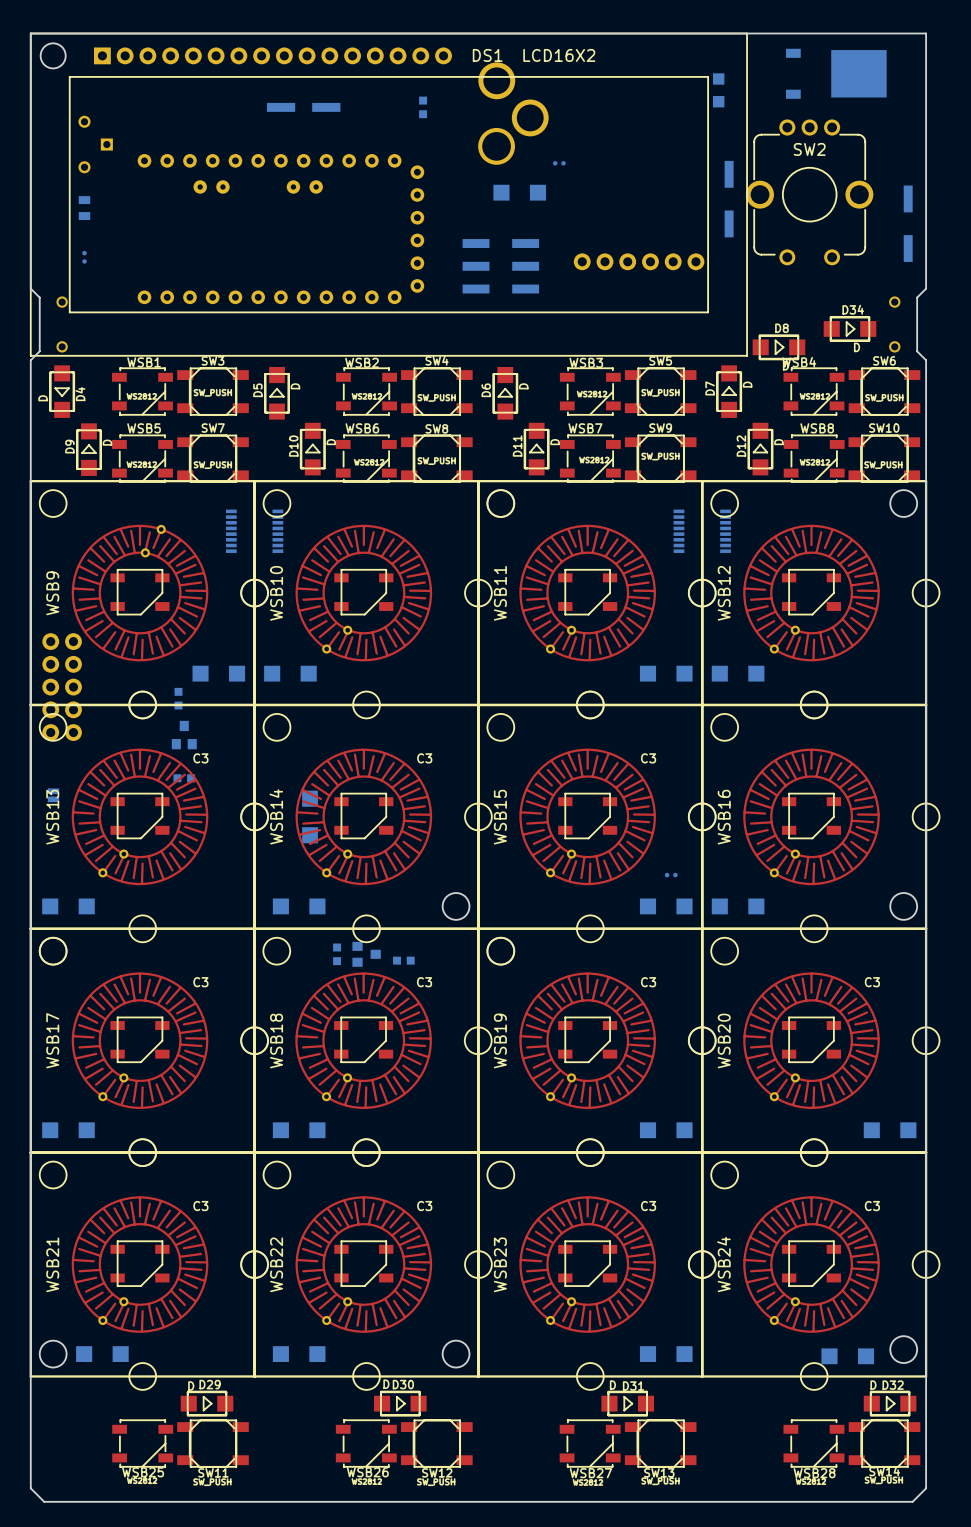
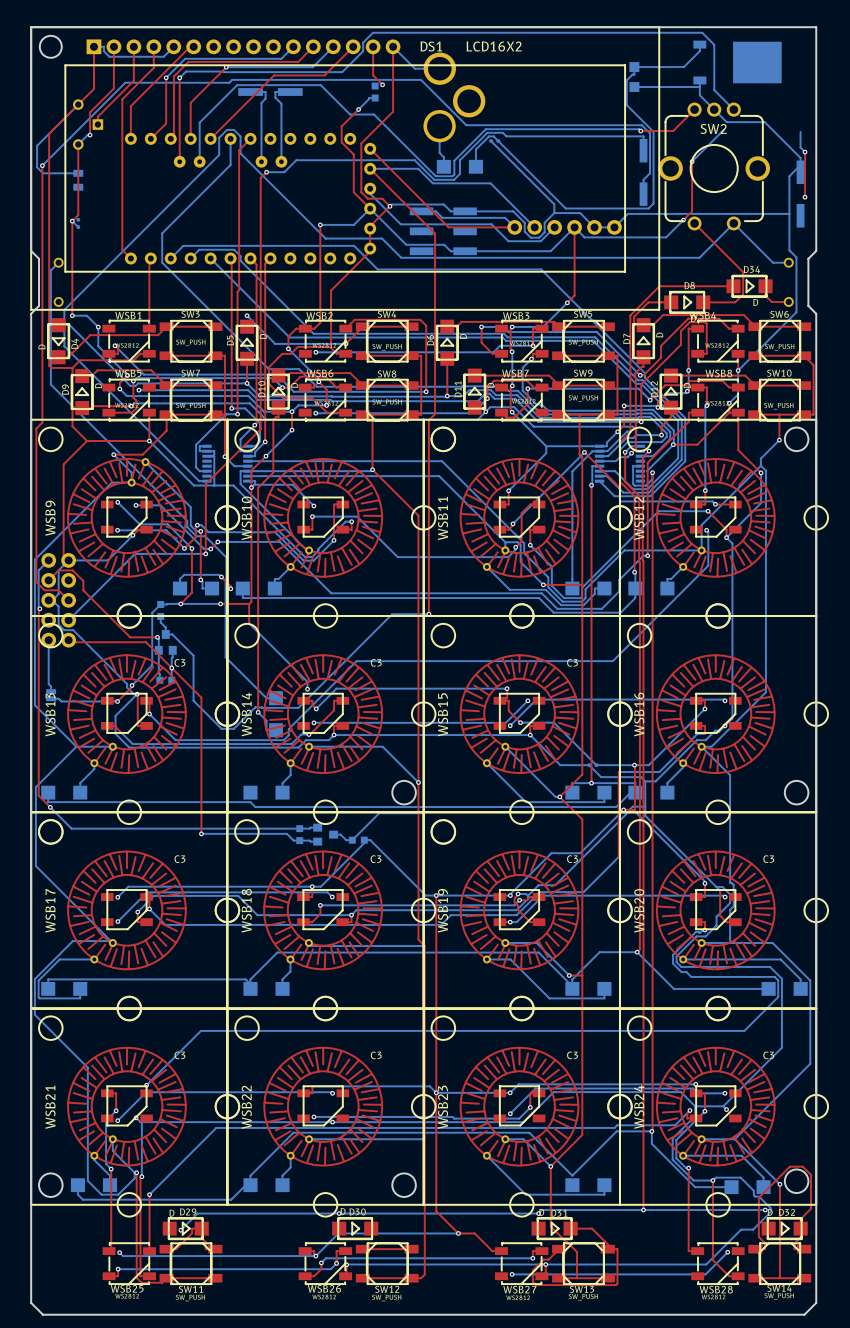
bottom track: none -> (699, 44) (699, 51) (683, 67) (634, 67) (634, 74) (626, 80) (626, 105) (653, 131) (653, 203) (648, 208) (565, 208) (493, 136) (489, 136) (475, 149) (475, 166)
bottom track: none -> (93, 46) (103, 46) (103, 51) (109, 56) (163, 56) (173, 46)
top track: none -> (93, 46) (93, 88) (49, 133) (49, 365) (51, 367) (72, 367)
top track: none -> (113, 46) (113, 88) (90, 112) (90, 135)
top track: none -> (133, 46) (133, 80) (97, 116) (97, 124)
top track: none -> (153, 46) (153, 67) (122, 99) (122, 249) (130, 258)
top track: none -> (193, 46) (190, 46) (130, 106) (130, 138)
bottom track: none -> (293, 46) (281, 58) (185, 58) (166, 77)
top track: none -> (313, 46) (298, 61) (188, 61) (173, 76) (173, 135) (170, 138)
bottom track: none -> (333, 46) (312, 67) (226, 67)
top track: none -> (353, 46) (324, 75) (274, 75) (210, 138)
top track: none -> (373, 46) (373, 75) (382, 84)
bottom track: none -> (393, 46) (414, 68) (439, 68)
top track: none -> (393, 46) (393, 111) (361, 143) (361, 192) (367, 198) (382, 198) (389, 206) (370, 226) (370, 251) (331, 290) (331, 348) (336, 353) (345, 353)
top track: none -> (226, 67) (190, 102) (190, 138)
via: none -> (226, 67)
top track: none -> (166, 77) (166, 123) (150, 138)
via: none -> (166, 77)
bottom track: none -> (179, 77) (186, 71) (342, 72) (363, 51) (363, 42) (373, 32) (702, 32) (714, 44) (714, 90) (733, 109)
top track: none -> (179, 77) (179, 161)
via: none -> (179, 77)
bottom track: none -> (699, 80) (699, 95) (726, 122) (764, 122) (800, 157) (800, 172)
via: none -> (382, 84)
bottom track: none -> (634, 87) (699, 87)
bottom track: none -> (250, 92) (265, 92) (265, 98) (261, 102) (261, 161)
bottom track: none -> (290, 92) (275, 92) (275, 97) (281, 103) (281, 161)
bottom track: none -> (375, 97) (369, 97) (358, 109)
bottom track: none -> (78, 104) (37, 145) (37, 167) (43, 173) (78, 173)
top track: none -> (358, 109) (341, 126) (341, 142) (353, 154) (353, 192) (370, 208)
via: none -> (358, 109)
top track: none -> (694, 109) (673, 131) (640, 131)
bottom track: none -> (439, 126) (439, 153) (443, 157) (443, 166)
bottom track: none -> (724, 129) (692, 161)
bottom track: none -> (640, 131) (638, 129) (485, 129) (454, 160) (454, 174) (452, 176) (435, 176) (374, 114) (350, 114) (320, 85) (237, 85) (199, 122) (199, 161)
via: none -> (640, 131)
bottom track: none -> (800, 131) (800, 147) (805, 152)
bottom track: none -> (90, 135) (78, 144)
via: none -> (90, 135)
bottom track: none -> (230, 138) (230, 164) (162, 233) (162, 262) (268, 369) (299, 369) (316, 386) (503, 386) (508, 390) (517, 390) (541, 414) (651, 413) (670, 431) (670, 438) (653, 456) (640, 456)
top track: none -> (250, 138) (239, 150) (237, 414)
bottom track: none -> (491, 141) (554, 204) (554, 213)
top track: none -> (78, 144) (78, 215) (72, 221) (72, 315)
top track: none -> (370, 148) (448, 227) (514, 227)
bottom track: none -> (643, 150) (643, 136) (506, 136) (502, 132) (487, 132) (459, 160) (459, 173) (454, 179) (434, 179) (414, 160) (296, 160) (284, 172) (266, 172)
top track: none -> (805, 152) (805, 197)
via: none -> (805, 152)
top track: none -> (692, 161) (692, 211) (683, 220)
via: none -> (692, 161)
bottom track: none -> (800, 165) (789, 176) (789, 250) (796, 257) (796, 312) (738, 370) (738, 394) (729, 403)
bottom track: none -> (42, 165) (125, 82) (229, 82) (232, 79) (421, 79) (466, 125) (641, 125) (650, 133) (650, 173) (643, 179) (643, 194)
top track: none -> (42, 165) (42, 422) (36, 428) (36, 582) (44, 590) (58, 590) (68, 600)
via: none -> (42, 165)
bottom track: none -> (370, 168) (418, 168) (432, 183) (490, 183) (534, 227)
top track: none -> (370, 168) (435, 233) (435, 414) (428, 420) (428, 614)
top track: none -> (266, 172) (260, 178) (260, 429) (205, 484) (205, 553)
via: none -> (266, 172)
bottom track: none -> (370, 188) (370, 193) (400, 224) (491, 224) (508, 241) (540, 241) (554, 227)
via: none -> (805, 197)
bottom track: none -> (389, 206) (391, 204) (443, 204) (450, 211) (513, 211) (524, 222) (524, 231) (530, 237) (539, 237) (544, 232) (544, 222) (554, 213)
via: none -> (389, 206)
bottom track: none -> (421, 211) (435, 211) (442, 217) (505, 217) (514, 227)
bottom track: none -> (554, 213) (580, 213) (594, 227) (614, 227) (627, 213) (789, 213)
bottom track: none -> (683, 220) (666, 237) (584, 237) (574, 227) (550, 251) (450, 251) (444, 244) (406, 244) (370, 208) (353, 224) (320, 224)
via: none -> (683, 220)
bottom track: none -> (72, 221) (78, 227)
via: none -> (72, 221)
top track: none -> (694, 223) (743, 272) (743, 294) (735, 302) (703, 302)
top track: none -> (320, 224) (320, 322) (314, 328) (296, 328) (288, 336) (288, 348)
via: none -> (320, 224)
top track: none -> (574, 227) (574, 295) (567, 302)
top track: none -> (150, 258) (149, 328)
bottom track: none -> (170, 258) (183, 245) (354, 245) (377, 269) (541, 269) (645, 373) (645, 377) (685, 417) (685, 461) (650, 496) (614, 496) (599, 481)
bottom track: none -> (190, 258) (199, 249) (234, 249) (240, 256) (240, 260) (313, 333) (504, 333) (507, 337) (595, 337) (638, 380) (642, 380) (681, 419) (681, 459) (648, 492) (623, 492) (606, 476) (599, 476)
bottom track: none -> (210, 258) (289, 337) (502, 337) (506, 340) (593, 340) (636, 383) (641, 383) (678, 420) (678, 458) (647, 489) (633, 489) (615, 471) (599, 471)
top track: none -> (230, 258) (231, 408)
top track: none -> (250, 258) (256, 264) (256, 423) (254, 425)
top track: none -> (270, 258) (265, 263) (265, 441)
bottom track: none -> (58, 262) (50, 270) (50, 384) (187, 520) (187, 527) (196, 536) (205, 536) (226, 557) (225, 657) (266, 698) (276, 698)
bottom track: none -> (788, 262) (773, 262) (733, 223) (699, 257) (401, 257) (382, 238) (325, 238) (240, 153) (240, 136) (234, 129) (226, 129) (219, 137) (219, 155) (64, 309) (64, 346) (199, 481) (207, 481)
top track: none -> (733, 286) (659, 286) (630, 315) (630, 431) (619, 442) (619, 481) (634, 496) (634, 572)
top track: none -> (765, 286) (765, 295) (771, 301) (788, 301)
bottom track: none -> (567, 302) (543, 326) (512, 326)
via: none -> (567, 302)
top track: none -> (671, 302) (648, 302) (634, 316) (634, 357) (643, 357) (643, 366) (635, 373) (635, 448) (631, 453)
bottom track: none -> (72, 315) (86, 315) (98, 327) (98, 346) (127, 375)
via: none -> (72, 315)
bottom track: none -> (247, 315) (275, 343) (346, 343)
via: none -> (247, 315)
bottom track: none -> (69, 325) (130, 385) (135, 385) (137, 383) (247, 383) (260, 396) (446, 396) (463, 396) (469, 390) (490, 390) (495, 395) (517, 395) (539, 417) (650, 416) (666, 433) (666, 436) (661, 442) (627, 442) (619, 450) (619, 457)
top track: none -> (643, 325) (653, 325) (663, 315) (743, 315) (755, 326) (804, 326)
via: none -> (98, 327)
top track: none -> (215, 326) (166, 326) (158, 335) (90, 335) (68, 357) (58, 357)
top track: none -> (411, 326) (362, 326) (346, 343)
top track: none -> (447, 326) (456, 326) (461, 321) (554, 321) (559, 326) (607, 326)
bottom track: none -> (481, 326) (503, 326) (509, 332) (596, 332) (640, 375)
top track: none -> (481, 326) (481, 342) (492, 353) (501, 353)
via: none -> (481, 326)
top track: none -> (512, 326) (510, 328) (512, 351)
via: none -> (512, 326)
top track: none -> (345, 328) (354, 319) (420, 319) (426, 325) (426, 391)
top track: none -> (542, 328) (533, 328) (533, 345)
top track: none -> (697, 328) (688, 328) (688, 370)
top track: none -> (738, 328) (729, 328) (719, 318) (688, 318) (660, 346) (660, 357) (643, 375) (640, 375)
via: none -> (346, 343)
bottom track: none -> (115, 345) (143, 374) (276, 374) (293, 391) (426, 391)
top track: none -> (115, 345) (117, 348) (117, 353) (108, 353)
via: none -> (115, 345)
bottom track: none -> (533, 345) (500, 345) (493, 352) (315, 352)
via: none -> (533, 345)
top track: none -> (331, 346) (297, 346) (290, 353) (282, 353) (268, 367) (268, 383) (283, 398) (312, 398) (326, 412) (345, 412)
bottom track: none -> (288, 348) (318, 379) (318, 381)
via: none -> (288, 348)
bottom track: none -> (512, 351) (512, 385)
via: none -> (512, 351)
via: none -> (315, 352)
top track: none -> (149, 353) (140, 353) (133, 360) (80, 360) (72, 367)
top track: none -> (542, 353) (533, 353) (531, 359)
top track: none -> (697, 353) (706, 353) (706, 323) (689, 322) (680, 331) (680, 344) (641, 384) (641, 421)
top track: none -> (738, 353) (738, 370)
top track: none -> (166, 355) (224, 355) (224, 456)
top track: none -> (362, 355) (421, 355) (421, 414) (362, 414)
top track: none -> (559, 355) (617, 355) (617, 414) (559, 414)
top track: none -> (755, 355) (804, 355) (813, 365) (813, 414) (755, 414)
top track: none -> (247, 358) (247, 383)
top track: none -> (447, 358) (447, 396)
bottom track: none -> (531, 359) (522, 367) (522, 390) (536, 404) (542, 404) (548, 410) (653, 409) (673, 430) (673, 444) (646, 471)
via: none -> (531, 359)
top track: none -> (72, 367) (72, 426) (87, 440)
bottom track: none -> (688, 370) (688, 389) (685, 393) (667, 393)
via: none -> (688, 370)
via: none -> (738, 370)
top track: none -> (127, 375) (119, 383) (119, 389)
via: none -> (127, 375)
top track: none -> (278, 375) (287, 375) (290, 373) (350, 373) (362, 385) (411, 385)
top track: none -> (474, 375) (549, 375) (559, 385) (607, 385)
via: none -> (640, 375)
top track: none -> (671, 375) (745, 375) (755, 385) (803, 385)
top track: none -> (82, 376) (91, 376) (97, 370) (151, 370) (166, 385) (215, 385)
bottom track: none -> (133, 381) (136, 378) (273, 378) (282, 387)
top track: none -> (133, 381) (133, 397) (136, 400) (136, 408) (132, 412) (108, 412)
via: none -> (133, 381)
via: none -> (318, 381)
via: none -> (247, 383)
top track: none -> (512, 385) (510, 387) (512, 412)
via: none -> (512, 385)
via: none -> (282, 387)
top track: none -> (305, 387) (314, 387) (318, 381) (326, 389) (326, 405)
top track: none -> (345, 387) (336, 387) (325, 376) (300, 376) (289, 387) (282, 387)
top track: none -> (542, 387) (533, 387) (527, 380) (494, 380) (487, 387) (487, 398)
top track: none -> (738, 387) (729, 387) (722, 381) (690, 381) (685, 385) (665, 385) (650, 400)
bottom track: none -> (527, 388) (638, 388) (650, 400)
top track: none -> (527, 388) (527, 404) (514, 417) (506, 417) (501, 412)
via: none -> (527, 388)
bottom track: none -> (119, 389) (126, 396) (248, 396) (264, 411) (292, 411) (298, 405) (326, 405)
via: none -> (119, 389)
bottom track: none -> (138, 390) (248, 390) (257, 399) (331, 401) (477, 401) (485, 393) (489, 393) (494, 398) (515, 398) (538, 421) (641, 421)
via: none -> (138, 390)
top track: none -> (687, 391) (688, 387) (706, 387) (706, 405)
via: none -> (687, 391)
via: none -> (426, 391)
top track: none -> (667, 393) (657, 402) (657, 407)
via: none -> (447, 396)
bottom track: none -> (487, 398) (472, 413) (315, 413)
via: none -> (487, 398)
via: none -> (650, 400)
top track: none -> (729, 403) (729, 412)
via: none -> (729, 403)
via: none -> (326, 405)
bottom track: none -> (131, 406) (134, 403) (249, 403) (266, 419) (477, 419) (490, 407) (514, 407) (533, 426) (632, 426) (636, 430) (636, 435)
top track: none -> (131, 406) (82, 408)
via: none -> (131, 406)
bottom track: none -> (624, 405) (656, 405) (657, 407)
top track: none -> (624, 405) (624, 425) (617, 431)
via: none -> (624, 405)
bottom track: none -> (706, 405) (705, 407) (705, 490)
via: none -> (706, 405)
top track: none -> (278, 407) (278, 417) (273, 419) (273, 472) (258, 487) (258, 712)
via: none -> (657, 407)
top track: none -> (671, 407) (671, 417) (661, 426) (661, 435)
bottom track: none -> (231, 408) (245, 408) (260, 423) (260, 441) (255, 446) (247, 446)
via: none -> (231, 408)
top track: none -> (292, 411) (292, 430)
via: none -> (292, 411)
via: none -> (485, 411)
bottom track: none -> (512, 412) (546, 446)
via: none -> (512, 412)
top track: none -> (149, 412) (149, 440) (87, 440)
via: none -> (315, 413)
top track: none -> (697, 412) (688, 412) (688, 421) (647, 462) (647, 555)
top track: none -> (729, 412) (738, 412) (738, 450) (761, 472)
top track: none -> (729, 412) (697, 444) (673, 444)
bottom track: none -> (237, 414) (226, 414) (196, 444) (196, 467) (199, 471) (207, 471)
via: none -> (237, 414)
top track: none -> (224, 414) (166, 414) (166, 430) (142, 454) (113, 454)
top track: none -> (372, 414) (372, 469) (418, 515) (418, 939) (424, 946) (424, 1274) (421, 1278) (362, 1278)
top track: none -> (579, 414) (579, 454) (582, 457) (582, 774) (559, 796) (582, 819) (582, 1134) (550, 1166) (550, 1226) (577, 1251) (577, 1278)
top track: none -> (779, 414) (779, 440)
via: none -> (641, 421)
bottom track: none -> (254, 425) (240, 439) (240, 451) (247, 451)
via: none -> (254, 425)
bottom track: none -> (292, 430) (266, 456)
via: none -> (292, 430)
bottom track: none -> (617, 431) (606, 442) (606, 446) (546, 446)
via: none -> (617, 431)
bottom track: none -> (630, 431) (627, 431) (607, 451) (592, 451) (572, 471) (572, 588)
bottom track: none -> (636, 435) (661, 435)
bottom track: none -> (636, 435) (633, 437) (626, 437) (608, 456) (599, 456)
via: none -> (661, 435)
bottom track: none -> (779, 440) (760, 458) (760, 465)
via: none -> (779, 440)
top track: none -> (87, 440) (63, 464) (63, 555) (68, 560)
bottom track: none -> (149, 440) (193, 485) (233, 485) (305, 557) (312, 557) (345, 521) (351, 521)
via: none -> (149, 440)
bottom track: none -> (265, 441) (255, 451) (255, 456) (247, 456)
via: none -> (265, 441)
via: none -> (673, 444)
bottom track: none -> (207, 446) (199, 446) (199, 451) (214, 451) (212, 456)
bottom track: none -> (546, 446) (546, 453) (508, 490)
bottom track: none -> (640, 446) (631, 446) (625, 452)
top track: none -> (649, 451) (642, 457) (643, 1210)
via: none -> (649, 451)
bottom track: none -> (584, 452) (512, 523)
top track: none -> (584, 452) (620, 487) (620, 501)
via: none -> (584, 452)
top track: none -> (625, 452) (625, 481) (639, 495) (639, 949) (637, 952)
via: none -> (625, 452)
bottom track: none -> (631, 453) (627, 457) (619, 457)
via: none -> (631, 453)
bottom track: none -> (113, 454) (131, 472) (131, 482) (111, 482) (34, 559) (34, 705) (76, 746)
via: none -> (113, 454)
bottom track: none -> (207, 456) (214, 456) (214, 485)
top track: none -> (266, 456) (251, 470) (251, 601) (249, 603)
via: none -> (266, 456)
bottom track: none -> (224, 456) (234, 466) (247, 466)
via: none -> (224, 456)
bottom track: none -> (619, 457) (615, 461) (599, 461)
bottom track: none -> (247, 461) (442, 461) (524, 543) (524, 553) (548, 577) (548, 587) (562, 601) (582, 601) (585, 598) (585, 589) (624, 550) (701, 550) (701, 525) (760, 465)
bottom track: none -> (145, 462) (190, 507) (190, 525) (196, 531) (200, 531)
bottom track: none -> (760, 465) (765, 470) (765, 692) (711, 746) (701, 746) (730, 775) (730, 882) (733, 884) (733, 906) (730, 909) (730, 942)
bottom track: none -> (599, 466) (592, 466) (591, 485)
bottom track: none -> (640, 466) (633, 466) (634, 485) (645, 485) (652, 478) (652, 472)
bottom track: none -> (372, 469) (240, 471) (240, 484) (309, 550)
via: none -> (372, 469)
top track: none -> (652, 472) (651, 1131)
via: none -> (652, 472)
bottom track: none -> (761, 472) (761, 503) (726, 537) (732, 543) (732, 718) (719, 731) (715, 730) (706, 740) (696, 740) (655, 781) (645, 781)
via: none -> (761, 472)
bottom track: none -> (247, 476) (439, 476) (505, 542)
bottom track: none -> (247, 481) (255, 481) (255, 484)
top track: none -> (591, 485) (591, 783)
via: none -> (591, 485)
bottom track: none -> (251, 487) (254, 484) (292, 484) (313, 505)
via: none -> (251, 487)
top track: none -> (705, 490) (705, 504) (696, 504)
via: none -> (705, 490)
top track: none -> (508, 490) (508, 504) (499, 504)
via: none -> (508, 490)
bottom track: none -> (620, 501) (712, 501) (715, 504)
bottom track: none -> (117, 502) (139, 524) (167, 524) (191, 548)
via: none -> (117, 502)
top track: none -> (342, 504) (334, 504) (334, 540)
top track: none -> (539, 504) (530, 504) (521, 513) (521, 541) (515, 547)
top track: none -> (715, 504) (735, 504)
via: none -> (715, 504)
bottom track: none -> (136, 505) (160, 505) (204, 548) (210, 548)
via: none -> (136, 505)
via: none -> (313, 505)
bottom track: none -> (708, 511) (658, 511) (582, 587) (580, 598) (564, 598) (551, 585) (551, 566) (530, 545)
top track: none -> (708, 511) (726, 529) (726, 537)
via: none -> (708, 511)
bottom track: none -> (312, 516) (357, 516) (397, 557) (508, 557) (515, 547)
top track: none -> (312, 516) (312, 529) (303, 529)
via: none -> (312, 516)
top track: none -> (351, 521) (351, 529) (342, 529)
via: none -> (351, 521)
top track: none -> (512, 523) (508, 529) (499, 529)
via: none -> (512, 523)
bottom track: none -> (197, 525) (201, 525) (208, 532) (275, 532) (303, 560) (313, 560) (334, 540)
top track: none -> (197, 525) (195, 537) (184, 548)
via: none -> (197, 525)
top track: none -> (146, 529) (137, 529) (132, 535)
top track: none -> (539, 529) (530, 529) (530, 545)
bottom track: none -> (117, 530) (166, 530) (184, 548)
via: none -> (117, 530)
bottom track: none -> (706, 530) (708, 532) (708, 565) (612, 661) (356, 661) (288, 729) (288, 735) (283, 740) (175, 740) (149, 714)
via: none -> (706, 530)
top track: none -> (200, 531) (200, 579)
via: none -> (200, 531)
bottom track: none -> (132, 535) (107, 560) (68, 560) (58, 570) (58, 594) (52, 600)
via: none -> (132, 535)
via: none -> (726, 537)
via: none -> (334, 540)
bottom track: none -> (217, 541) (279, 541) (331, 593) (541, 593) (557, 608) (601, 608) (619, 591) (619, 580) (643, 555) (647, 555)
top track: none -> (217, 541) (210, 548)
via: none -> (217, 541)
bottom track: none -> (505, 542) (505, 550)
bottom track: none -> (505, 542) (517, 542) (520, 545) (520, 562) (543, 584)
via: none -> (530, 545)
via: none -> (515, 547)
via: none -> (184, 548)
top track: none -> (191, 548) (191, 592) (180, 603)
via: none -> (191, 548)
via: none -> (210, 548)
bottom track: none -> (205, 553) (134, 553) (68, 620)
via: none -> (205, 553)
via: none -> (647, 555)
bottom track: none -> (48, 560) (38, 570) (39, 608)
bottom track: none -> (290, 566) (278, 579) (274, 579) (274, 588)
bottom track: none -> (486, 566) (509, 589) (545, 589) (561, 605) (583, 605) (594, 593) (594, 588) (604, 588)
bottom track: none -> (683, 566) (671, 579) (667, 579) (667, 588)
bottom track: none -> (634, 572) (635, 598) (620, 612) (553, 612) (539, 598) (242, 598) (242, 588)
via: none -> (634, 572)
bottom track: none -> (221, 577) (219, 574) (184, 574) (180, 579) (180, 588)
top track: none -> (221, 577) (230, 586) (230, 588)
via: none -> (221, 577)
bottom track: none -> (200, 579) (202, 588) (212, 588)
via: none -> (200, 579)
top track: none -> (48, 580) (58, 570) (72, 570) (83, 581) (83, 590) (130, 637) (157, 637)
top track: none -> (543, 584) (582, 584)
via: none -> (543, 584)
via: none -> (230, 588)
bottom track: none -> (52, 600) (58, 606) (58, 624) (64, 630) (73, 630) (127, 684) (127, 687) (133, 694) (137, 694) (115, 715) (115, 733) (129, 747) (298, 747) (306, 740) (328, 740) (334, 735) (530, 735) (560, 765) (589, 765) (601, 777) (641, 777) (645, 781)
via: none -> (180, 603)
bottom track: none -> (220, 603) (160, 604) (152, 612) (152, 665) (132, 685)
top track: none -> (220, 603) (249, 603)
via: none -> (220, 603)
top track: none -> (249, 603) (249, 623)
top track: none -> (39, 608) (38, 795) (50, 807)
via: none -> (39, 608)
bottom track: none -> (428, 614) (392, 614) (298, 707) (255, 707) (233, 728) (221, 728) (193, 700) (193, 655) (172, 634) (165, 634) (165, 627) (160, 622) (160, 616)
via: none -> (428, 614)
bottom track: none -> (249, 623) (307, 681) (307, 689)
bottom track: none -> (157, 637) (159, 680)
via: none -> (157, 637)
bottom track: none -> (48, 640) (48, 684) (51, 686) (51, 691)
top track: none -> (68, 640) (70, 642) (146, 642) (201, 697) (201, 833)
bottom track: none -> (172, 650) (171, 680)
via: none -> (171, 668)
top track: none -> (132, 685) (117, 701) (107, 700)
via: none -> (132, 685)
bottom track: none -> (507, 688) (336, 688) (316, 708)
top track: none -> (507, 688) (507, 697) (504, 700)
via: none -> (507, 688)
via: none -> (307, 689)
top track: none -> (137, 694) (137, 725) (146, 725)
via: none -> (137, 694)
bottom track: none -> (51, 698) (58, 698) (61, 701) (117, 701)
top track: none -> (146, 700) (149, 703) (149, 714)
top track: none -> (303, 700) (312, 700) (312, 705) (316, 708)
top track: none -> (342, 700) (334, 700) (334, 710) (308, 734)
top track: none -> (499, 700) (508, 700) (508, 710) (520, 722)
bottom track: none -> (527, 700) (505, 722) (313, 722)
via: none -> (527, 700)
top track: none -> (696, 700) (704, 700) (704, 708)
bottom track: none -> (725, 700) (536, 699) (510, 725)
via: none -> (725, 700)
via: none -> (117, 701)
via: none -> (316, 708)
bottom track: none -> (704, 708) (648, 765) (596, 765) (553, 722) (520, 722)
via: none -> (704, 708)
bottom track: none -> (258, 712) (266, 720) (266, 730) (276, 730)
via: none -> (258, 712)
via: none -> (149, 714)
via: none -> (313, 722)
via: none -> (520, 722)
top track: none -> (107, 725) (116, 725) (120, 731)
top track: none -> (342, 725) (334, 725) (334, 735)
via: none -> (510, 725)
top track: none -> (539, 725) (530, 725) (530, 735)
top track: none -> (696, 725) (704, 725) (704, 733)
via: none -> (724, 725)
bottom track: none -> (120, 731) (132, 744) (291, 744) (301, 734) (308, 734)
bottom track: none -> (704, 733) (697, 733) (659, 772) (618, 772)
via: none -> (308, 734)
via: none -> (334, 735)
via: none -> (530, 735)
bottom track: none -> (76, 746) (112, 746)
bottom track: none -> (76, 746) (35, 787) (35, 866) (112, 942)
bottom track: none -> (309, 746) (382, 746) (418, 782)
bottom track: none -> (505, 746) (555, 796) (559, 796)
bottom track: none -> (94, 763) (94, 769) (80, 783) (80, 792)
bottom track: none -> (290, 763) (290, 775) (282, 783) (282, 792)
bottom track: none -> (486, 763) (525, 802) (604, 802) (604, 792)
bottom track: none -> (683, 763) (683, 767) (667, 783) (667, 792)
top track: none -> (634, 765) (634, 811) (623, 809)
via: none -> (634, 765)
top track: none -> (618, 772) (618, 857)
bottom track: none -> (645, 781) (645, 815) (720, 890)
via: none -> (418, 782)
via: none -> (591, 783)
bottom track: none -> (635, 787) (616, 807) (255, 807) (250, 802) (48, 802) (48, 792)
bottom track: none -> (572, 792) (572, 783) (635, 783) (635, 792)
via: none -> (559, 796)
bottom track: none -> (645, 806) (632, 806) (555, 885) (538, 885) (528, 895)
bottom track: none -> (50, 807) (71, 828) (317, 827)
via: none -> (50, 807)
bottom track: none -> (623, 809) (580, 853) (551, 853) (510, 895) (425, 895) (370, 840) (364, 840)
via: none -> (623, 809)
bottom track: none -> (634, 811) (704, 883)
bottom track: none -> (424, 813) (379, 813) (352, 840) (346, 840) (340, 834) (333, 834)
bottom track: none -> (201, 833) (286, 833) (293, 840) (317, 841)
via: none -> (201, 833)
bottom track: none -> (367, 840) (320, 886) (128, 886) (117, 897)
bottom track: none -> (618, 857) (583, 892) (539, 892) (516, 915) (450, 915) (441, 924) (165, 924) (149, 909)
top track: none -> (704, 883) (704, 897) (696, 897)
via: none -> (704, 883)
top track: none -> (312, 886) (312, 897) (303, 897)
via: none -> (312, 886)
bottom track: none -> (716, 886) (722, 886) (730, 894) (730, 903) (716, 916) (716, 925) (705, 936) (696, 936) (676, 956) (676, 962) (681, 966) (770, 966) (781, 978) (781, 1047) (723, 1106)
top track: none -> (720, 890) (720, 915) (726, 922) (735, 922)
bottom track: none -> (518, 894) (528, 895)
top track: none -> (518, 894) (514, 898) (518, 909) (530, 922) (539, 922)
via: none -> (518, 894)
top track: none -> (436, 895) (436, 1211) (458, 1233) (474, 1233) (492, 1251) (501, 1251)
via: none -> (436, 895)
via: none -> (510, 895)
bottom track: none -> (528, 895) (528, 898) (516, 910) (356, 910) (351, 915) (257, 915) (238, 895) (153, 895) (137, 912)
via: none -> (117, 897)
top track: none -> (146, 897) (149, 899) (149, 909)
bottom track: none -> (332, 897) (327, 892) (147, 892) (117, 921)
via: none -> (332, 897)
top track: none -> (539, 897) (519, 900)
bottom track: none -> (725, 897) (543, 895) (516, 922) (510, 922)
via: none -> (725, 897)
bottom track: none -> (519, 900) (514, 905) (320, 905)
via: none -> (519, 900)
top track: none -> (320, 905) (320, 913) (312, 922) (303, 922)
via: none -> (320, 905)
via: none -> (149, 909)
top track: none -> (137, 912) (137, 922) (146, 922)
via: none -> (137, 912)
top track: none -> (351, 915) (351, 922) (342, 922)
via: none -> (351, 915)
via: none -> (117, 921)
via: none -> (510, 922)
top track: none -> (696, 922) (704, 922) (704, 930)
bottom track: none -> (704, 930) (699, 932) (695, 932) (673, 954) (673, 963) (681, 972) (686, 972) (691, 976) (774, 976) (778, 980) (778, 997) (744, 1030) (200, 1030) (146, 1085)
via: none -> (704, 930)
bottom track: none -> (110, 941) (72, 941) (34, 979) (34, 1014) (87, 1067) (87, 1180) (101, 1194) (118, 1194) (134, 1178) (134, 1172)
bottom track: none -> (308, 942) (311, 946) (424, 946)
bottom track: none -> (505, 942) (536, 942) (569, 975)
bottom track: none -> (701, 942) (772, 942) (810, 980) (810, 1063) (734, 1139)
via: none -> (637, 952)
bottom track: none -> (94, 959) (59, 959) (38, 980) (38, 997) (80, 998) (80, 988)
bottom track: none -> (290, 959) (290, 971) (282, 979) (282, 988)
bottom track: none -> (486, 959) (510, 959) (549, 998) (604, 998) (604, 988)
bottom track: none -> (683, 959) (780, 959) (800, 979) (800, 988)
top track: none -> (569, 975) (582, 975)
via: none -> (569, 975)
bottom track: none -> (250, 984) (245, 979) (48, 979) (48, 988)
bottom track: none -> (572, 984) (538, 952) (277, 952) (250, 979) (250, 988)
bottom track: none -> (572, 988) (572, 979) (599, 952) (637, 952) (673, 988) (768, 988)
bottom track: none -> (695, 1084) (518, 1084) (510, 1092) (436, 1092) (429, 1086) (312, 1086)
via: none -> (695, 1084)
via: none -> (146, 1085)
top track: none -> (312, 1086) (312, 1093) (303, 1093)
via: none -> (436, 1092)
via: none -> (510, 1092)
top track: none -> (107, 1093) (116, 1093) (116, 1110)
bottom track: none -> (332, 1093) (146, 1092) (117, 1120)
via: none -> (332, 1093)
top track: none -> (539, 1093) (530, 1093) (530, 1107)
top track: none -> (696, 1093) (704, 1093) (704, 1111)
bottom track: none -> (725, 1093) (697, 1093) (693, 1088) (535, 1088) (510, 1113)
via: none -> (725, 1093)
bottom track: none -> (695, 1106) (695, 1116) (672, 1138) (672, 1159) (693, 1180) (712, 1180) (715, 1177) (740, 1177) (753, 1190) (753, 1195) (759, 1196) (770, 1208) (770, 1212) (753, 1229) (741, 1229) (706, 1264) (346, 1264)
bottom track: none -> (695, 1106) (723, 1106)
bottom track: none -> (695, 1106) (680, 1092) (553, 1092) (523, 1122) (140, 1122) (136, 1117)
bottom track: none -> (723, 1106) (726, 1109)
bottom track: none -> (530, 1107) (519, 1118) (313, 1116)
via: none -> (530, 1107)
via: none -> (726, 1109)
bottom track: none -> (689, 1110) (675, 1125) (617, 1125) (614, 1127) (216, 1127) (149, 1194)
top track: none -> (689, 1110) (687, 1113) (687, 1118) (696, 1118)
via: none -> (689, 1110)
bottom track: none -> (116, 1110) (106, 1120) (106, 1163) (111, 1169)
via: none -> (116, 1110)
bottom track: none -> (704, 1111) (676, 1139) (676, 1158) (686, 1168) (688, 1168)
via: none -> (704, 1111)
via: none -> (510, 1113)
via: none -> (313, 1116)
via: none -> (136, 1117)
via: none -> (117, 1120)
bottom track: none -> (141, 1122) (141, 1176)
via: none -> (332, 1122)
via: none -> (651, 1131)
bottom track: none -> (424, 1137) (423, 1139) (309, 1139)
bottom track: none -> (112, 1139) (112, 1150) (134, 1172)
bottom track: none -> (505, 1139) (523, 1139) (550, 1166)
bottom track: none -> (701, 1139) (734, 1139)
bottom track: none -> (734, 1139) (779, 1184)
bottom track: none -> (94, 1155) (94, 1160) (109, 1175) (109, 1185)
bottom track: none -> (290, 1155) (290, 1167) (282, 1175) (282, 1185)
bottom track: none -> (486, 1155) (525, 1194) (604, 1194) (604, 1185)
bottom track: none -> (683, 1155) (741, 1155) (763, 1177) (763, 1187)
via: none -> (550, 1166)
top track: none -> (688, 1168) (688, 1251) (697, 1251)
via: none -> (688, 1168)
top track: none -> (111, 1169) (111, 1248) (113, 1251)
via: none -> (111, 1169)
top track: none -> (136, 1172) (136, 1277) (141, 1282) (162, 1282) (166, 1278) (215, 1278)
via: none -> (136, 1172)
top track: none -> (141, 1176) (140, 1276) (149, 1276)
via: none -> (141, 1176)
bottom track: none -> (250, 1180) (231, 1199) (82, 1199) (77, 1194) (77, 1185)
top track: none -> (712, 1180) (712, 1260) (729, 1276) (738, 1276)
via: none -> (712, 1180)
top track: none -> (779, 1184) (779, 1278)
via: none -> (779, 1184)
bottom track: none -> (250, 1185) (250, 1175) (293, 1132) (529, 1132) (572, 1175) (616, 1131) (651, 1131) (651, 1143) (695, 1187) (731, 1187)
top track: none -> (149, 1194) (149, 1251)
via: none -> (149, 1194)
via: none -> (643, 1210)
bottom track: none -> (765, 1210) (542, 1210) (538, 1213) (197, 1213) (180, 1230)
via: none -> (765, 1210)
via: none -> (339, 1213)
via: none -> (538, 1213)
top track: none -> (570, 1228) (592, 1228) (612, 1249)
via: none -> (180, 1230)
bottom track: none -> (458, 1233) (338, 1233) (315, 1256) (123, 1256) (119, 1252)
via: none -> (458, 1233)
top track: none -> (166, 1249) (176, 1249) (192, 1233) (192, 1228) (201, 1228) (201, 1238) (205, 1242) (205, 1249) (215, 1249)
top track: none -> (362, 1249) (411, 1249)
top track: none -> (559, 1249) (548, 1259) (543, 1259) (532, 1270) (532, 1281) (536, 1285) (616, 1285) (617, 1249) (607, 1249)
top track: none -> (755, 1249) (765, 1249) (765, 1243) (758, 1236) (758, 1197) (789, 1166) (802, 1166) (810, 1174) (810, 1208) (800, 1219) (800, 1238) (794, 1243) (794, 1249) (804, 1249)
top track: none -> (305, 1251) (314, 1251) (315, 1256)
top track: none -> (345, 1251) (336, 1251) (336, 1263)
top track: none -> (541, 1251) (532, 1251) (532, 1258)
via: none -> (119, 1252)
bottom track: none -> (727, 1252) (705, 1274) (512, 1274)
via: none -> (727, 1252)
via: none -> (315, 1256)
bottom track: none -> (532, 1258) (326, 1258) (321, 1262)
via: none -> (532, 1258)
top track: none -> (321, 1262) (321, 1269) (314, 1276) (305, 1276)
via: none -> (321, 1262)
bottom track: none -> (336, 1263) (330, 1269) (118, 1269)
via: none -> (336, 1263)
top track: none -> (346, 1264) (345, 1276)
via: none -> (346, 1264)
top track: none -> (545, 1264) (545, 1272) (541, 1276)
via: none -> (545, 1264)
top track: none -> (118, 1269) (118, 1276) (109, 1276)
via: none -> (118, 1269)
via: none -> (512, 1274)
top track: none -> (559, 1278) (607, 1278)
top track: none -> (755, 1278) (804, 1278)

